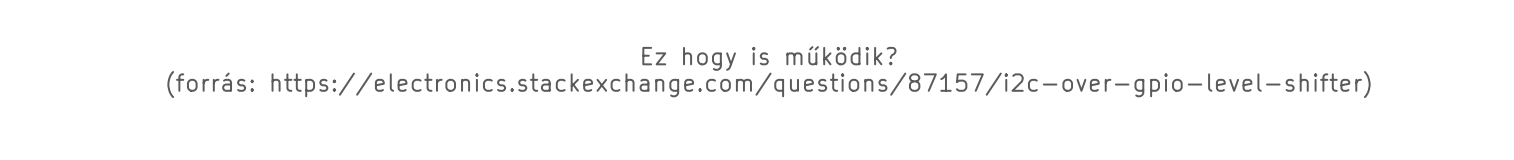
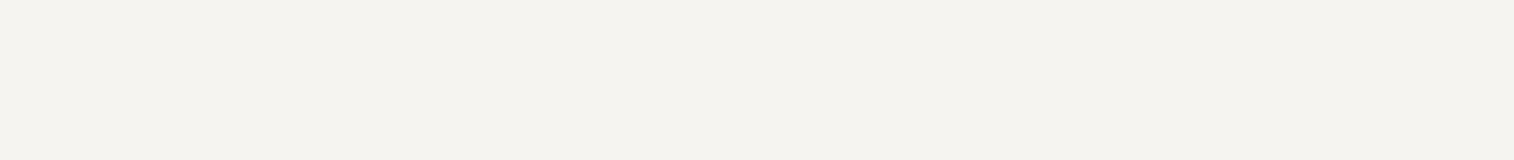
text: Ez hogy is működik? (769, 58) -> none
text: (forrás: https://electronics.stackexchange.com/questions/87157/i2c-over-gpio-level-shifter) (769, 84) -> none

